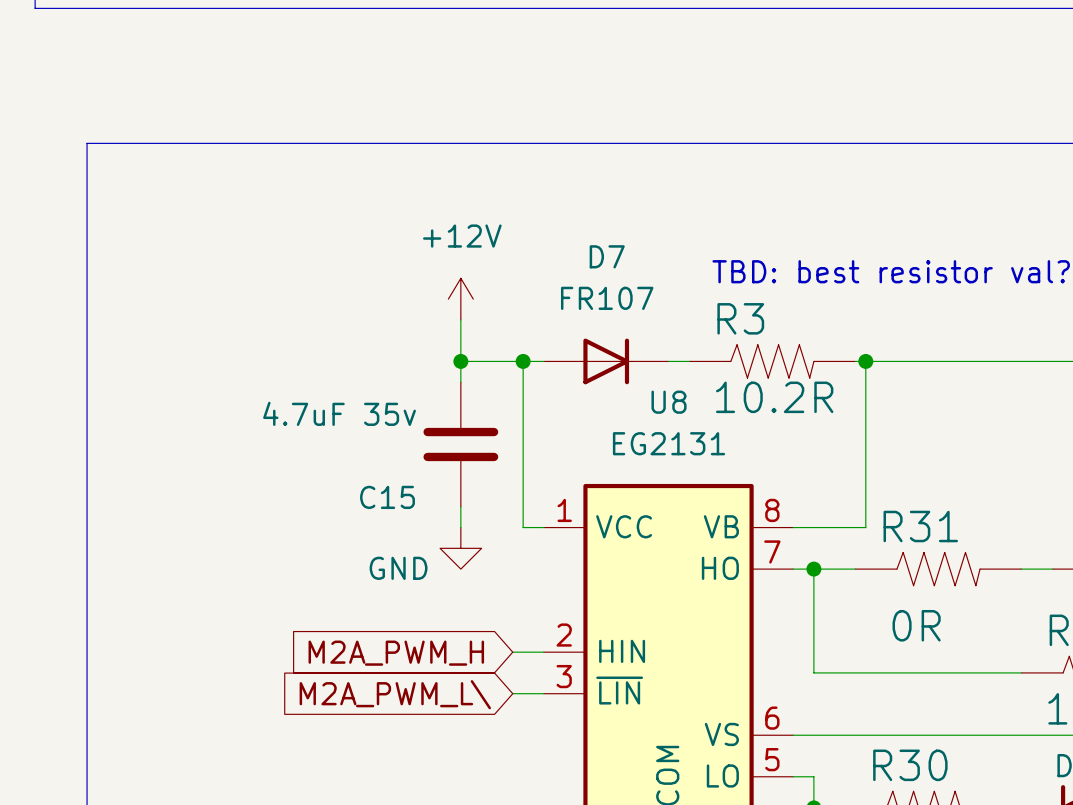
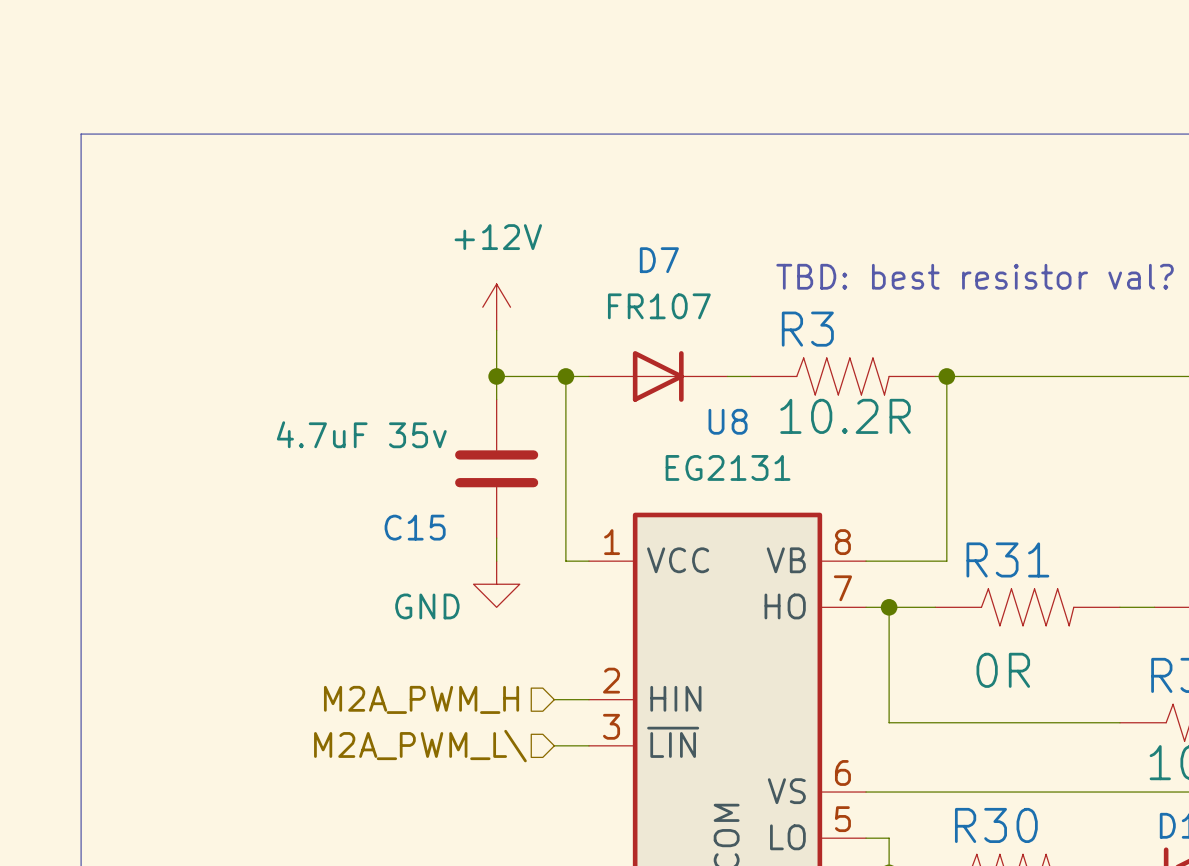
hierarchical label: none -> M2A_PWM_H (421, 699)
global label: M2A_PWM_H (396, 653) -> none
hierarchical label: none -> M2A_PWM_L\ (420, 746)
global label: M2A_PWM_L\ (395, 694) -> none

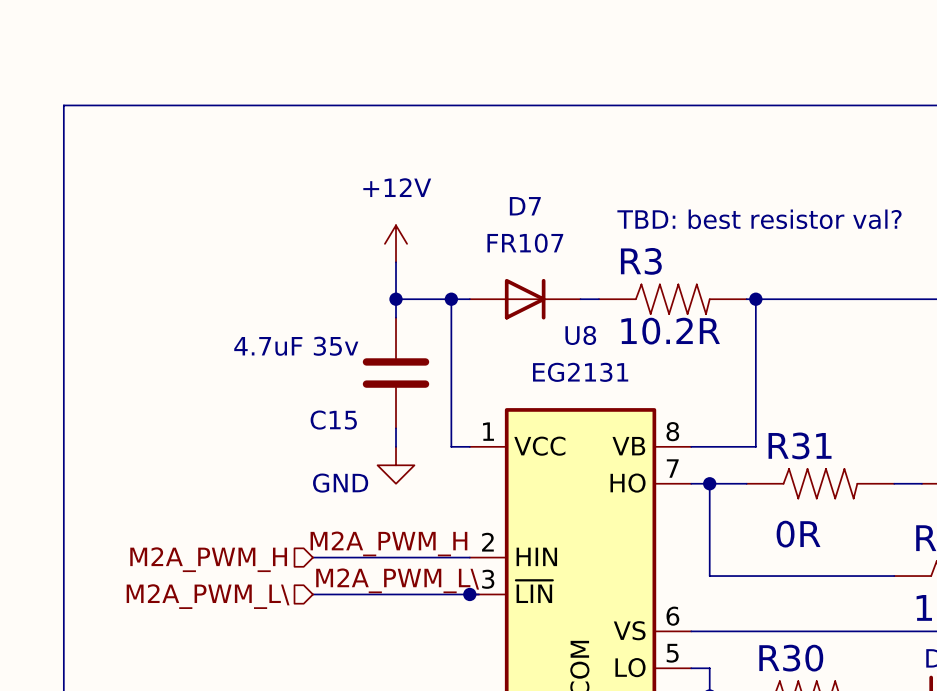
label: none -> M2A_PWM_H (388, 543)
wire: none -> (312, 557) (442, 557)
hierarchical label position: M2A_PWM_H (421, 699) -> M2A_PWM_H (208, 559)
label: none -> M2A_PWM_L\ (397, 580)
wire: none -> (312, 594) (442, 594)
junction: none -> (469, 594)
hierarchical label position: M2A_PWM_L\ (420, 746) -> M2A_PWM_L\ (208, 596)

